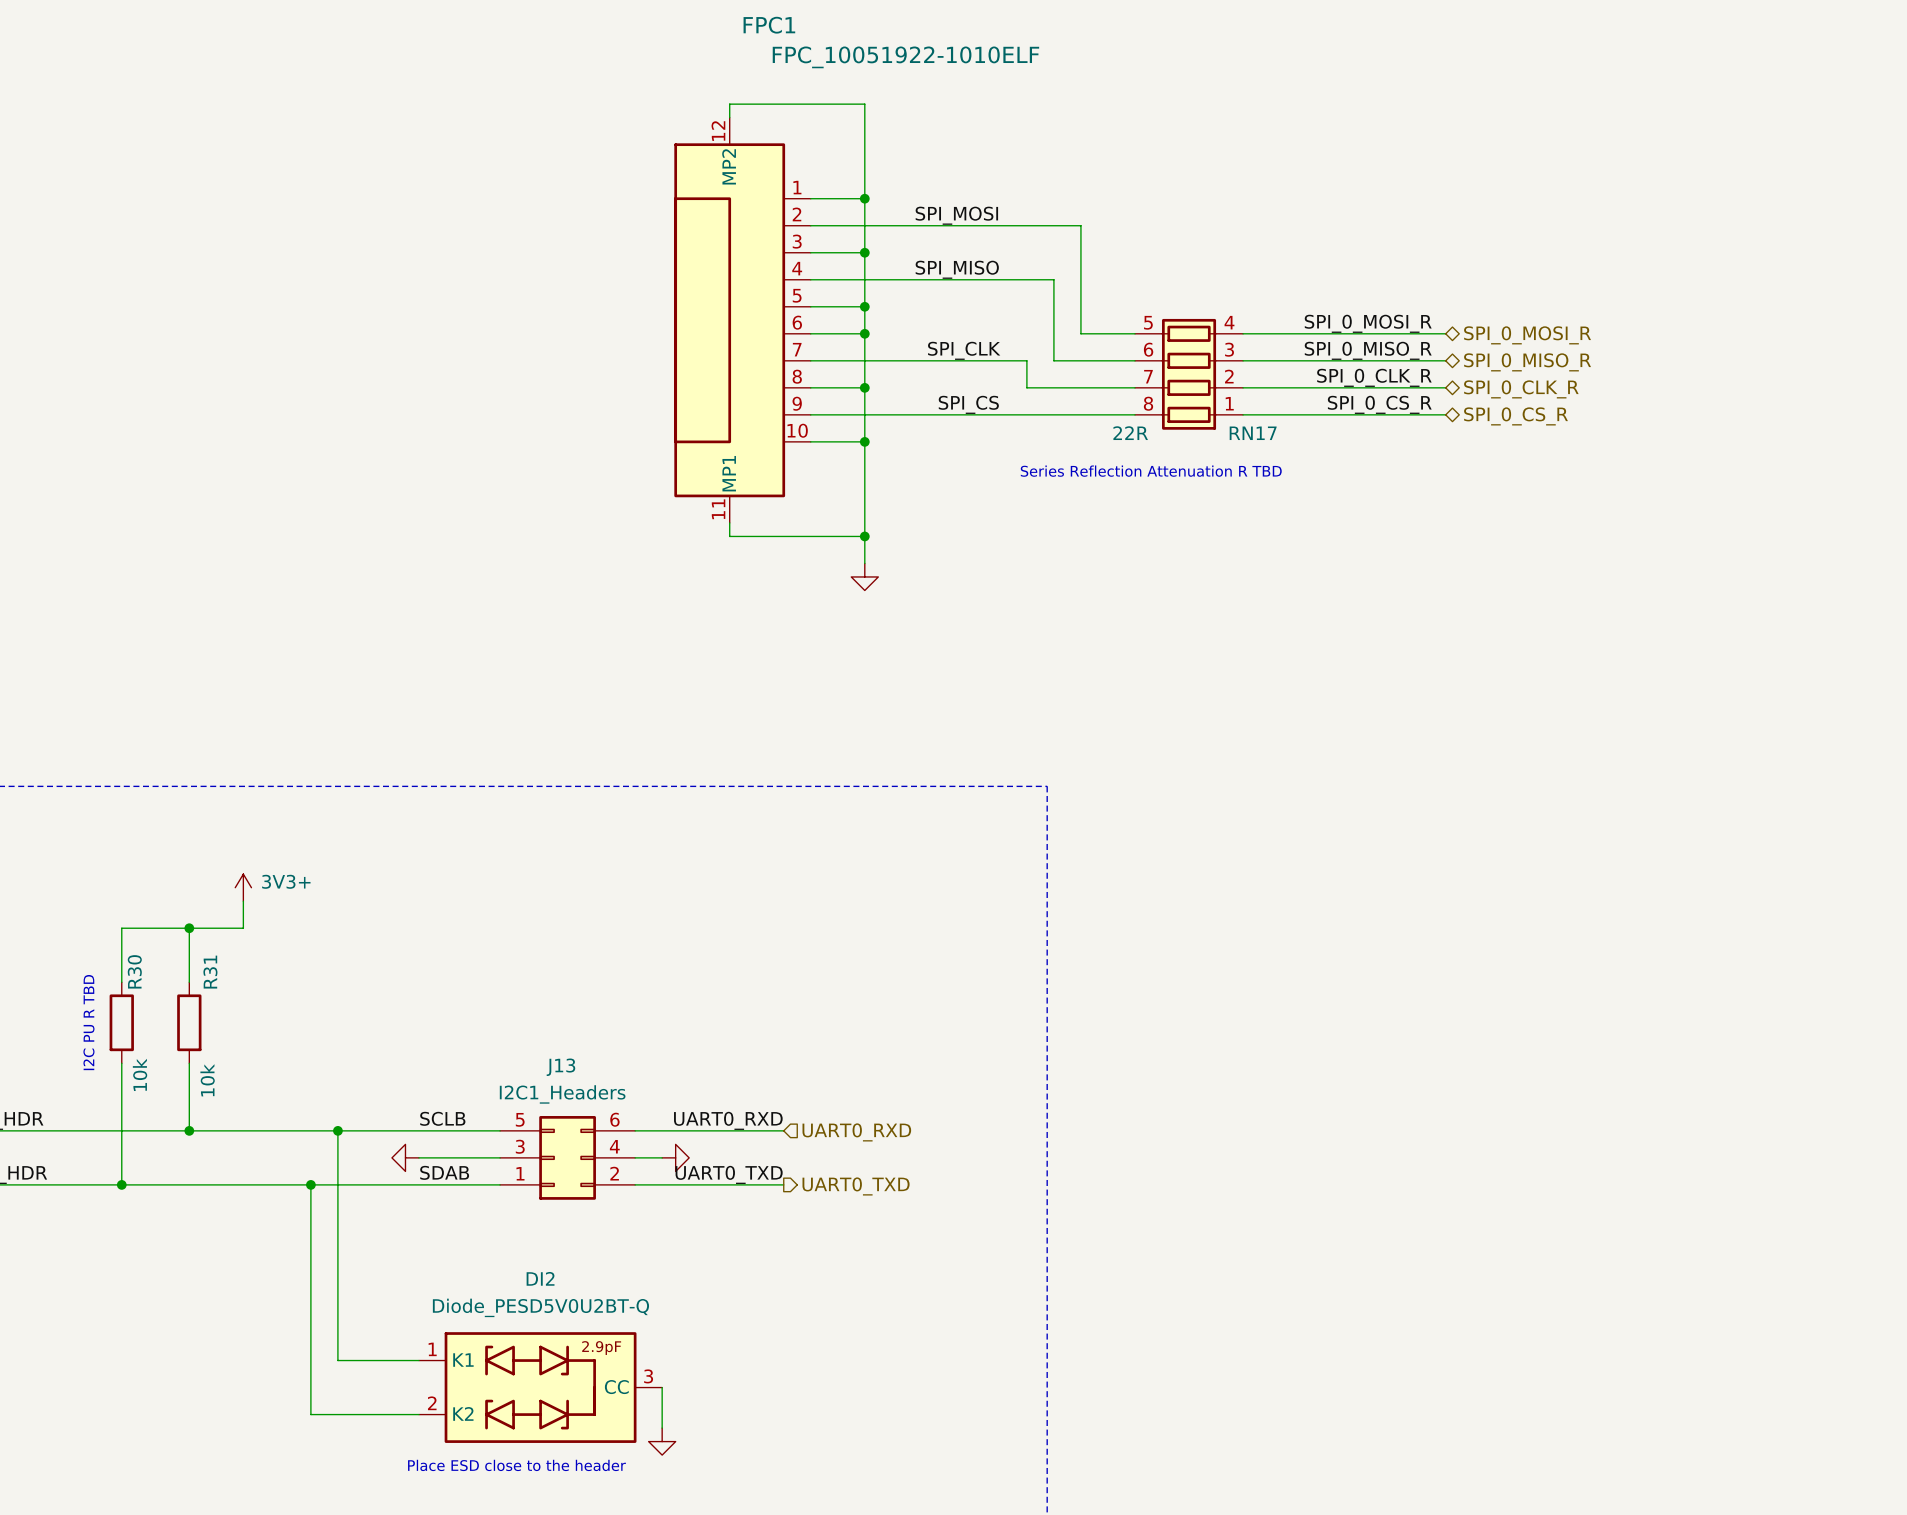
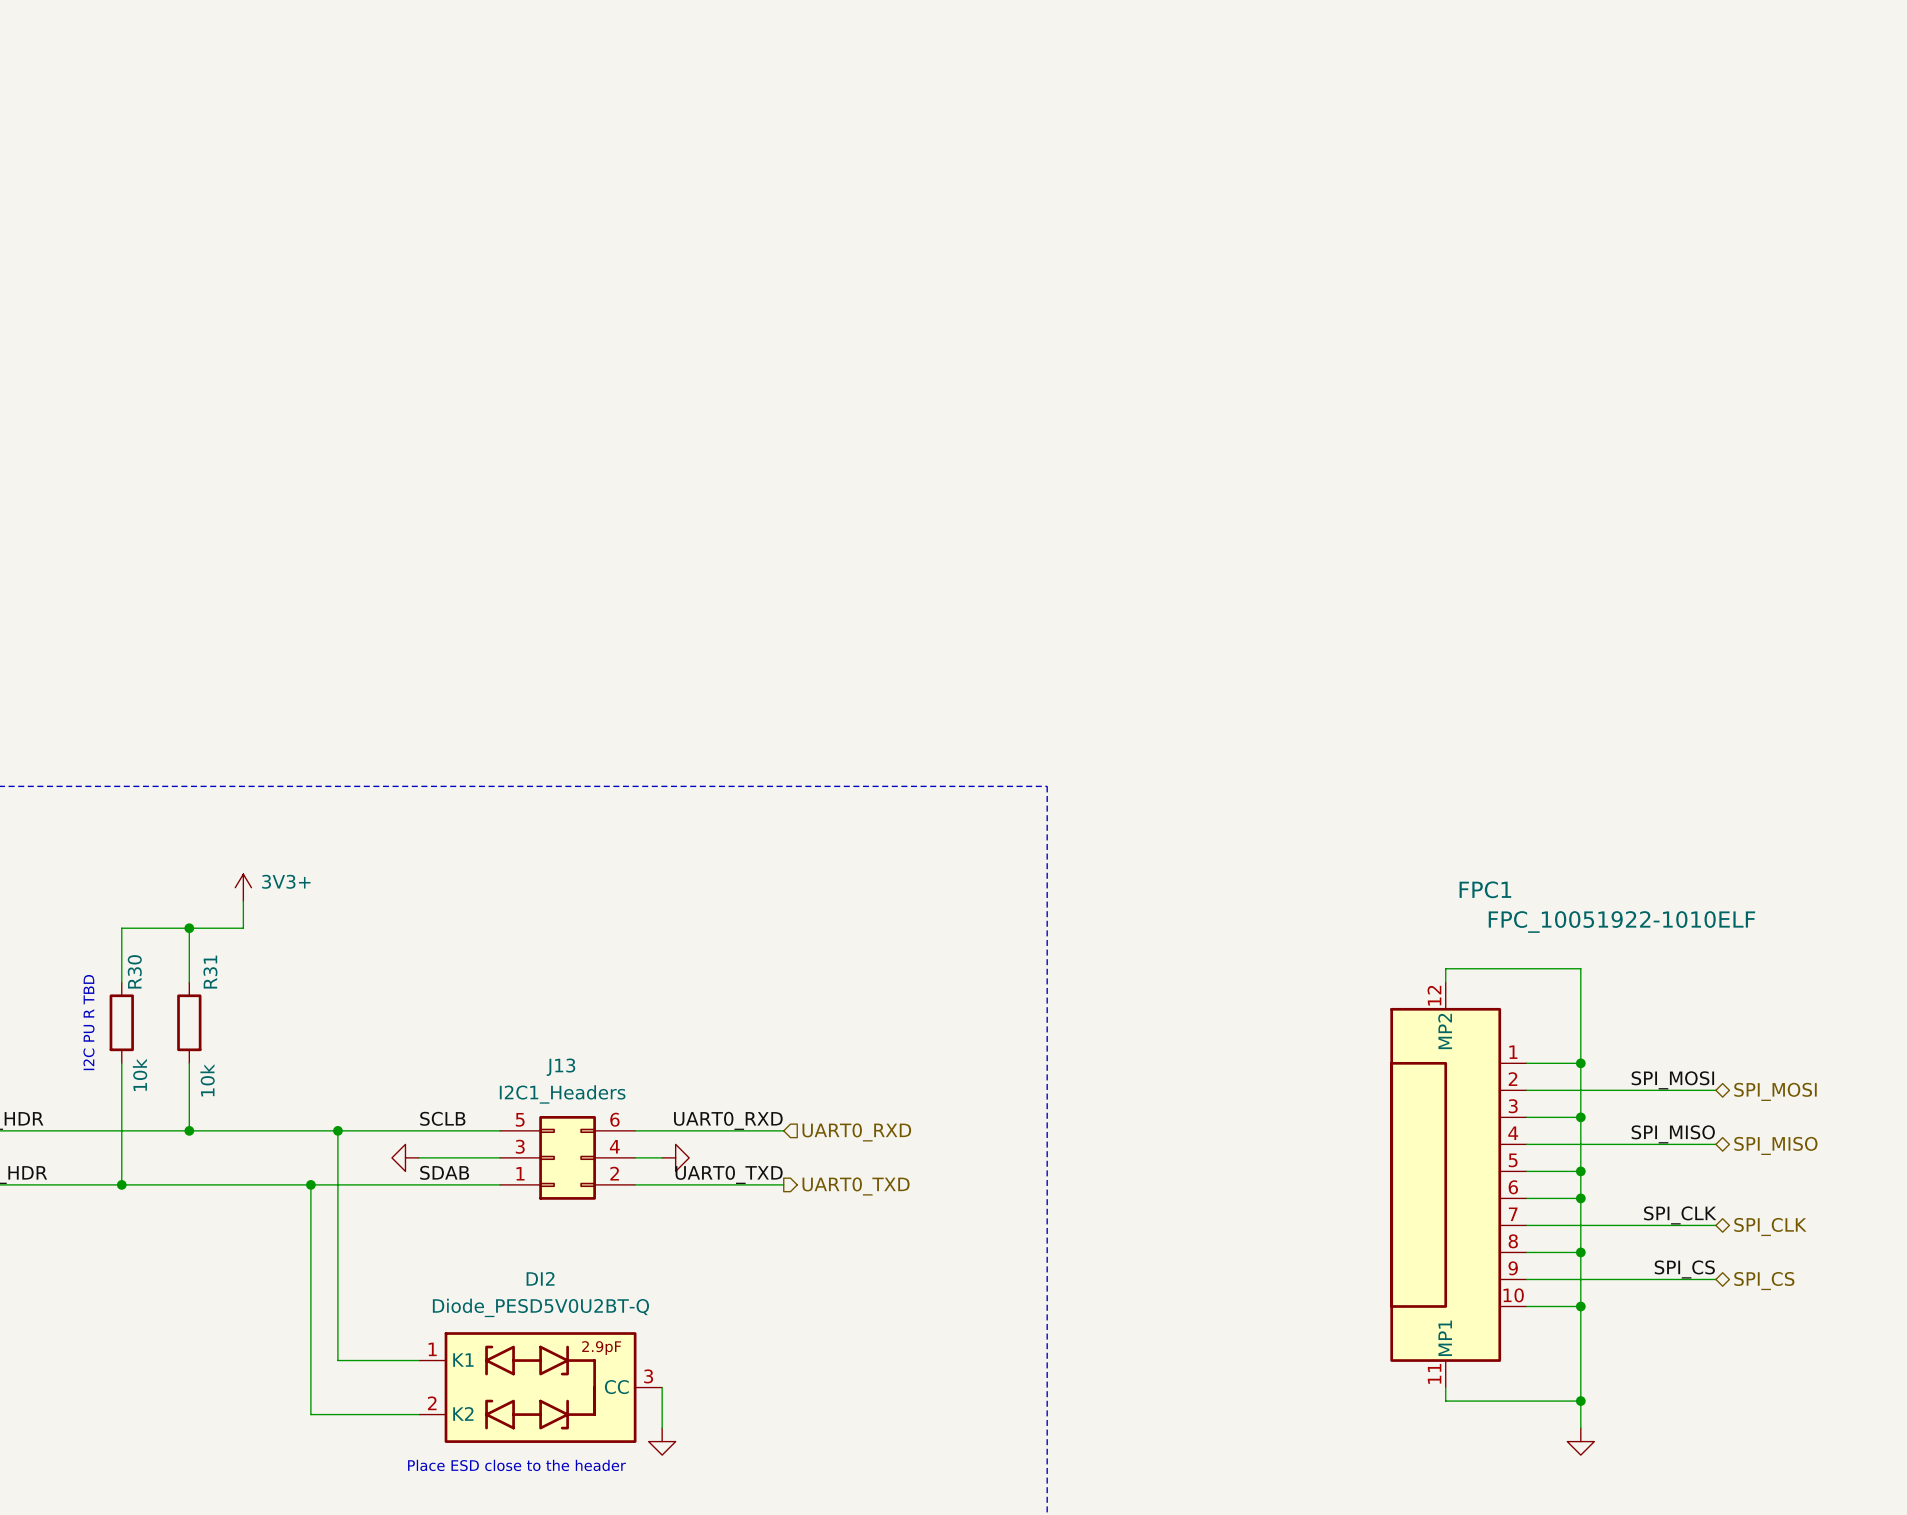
wire: (729, 117) (729, 104) (864, 104) (864, 563) -> none
wire: (810, 198) (864, 198) -> none
junction: (864, 198) -> none
label: SPI_MOSI (956, 215) -> none
wire: (810, 225) (1080, 225) (1080, 333) (1134, 333) -> none
wire: (810, 252) (864, 252) -> none
junction: (864, 252) -> none
label: SPI_MISO (957, 269) -> none
wire: (810, 279) (1053, 279) (1053, 360) (1134, 360) -> none
wire: (810, 306) (864, 306) -> none
junction: (864, 306) -> none
FPC1 position: (742, 320) -> (1458, 1184)
label: SPI_0_MOSI_R (1368, 323) -> none
wire: (810, 333) (864, 333) -> none
junction: (864, 333) -> none
wire: (1243, 333) (1445, 333) -> none
hierarchical label: SPI_0_MOSI_R (1527, 335) -> none
label: SPI_CLK (964, 350) -> none
label: SPI_0_MISO_R (1368, 350) -> none
wire: (810, 360) (1026, 360) (1026, 387) (1134, 387) -> none
wire: (1243, 360) (1445, 360) -> none
hierarchical label: SPI_0_MISO_R (1527, 362) -> none
RN17: 22R (1189, 374) -> none
label: SPI_0_CLK_R (1374, 377) -> none
wire: (810, 387) (864, 387) -> none
junction: (864, 387) -> none
wire: (1243, 387) (1445, 387) -> none
hierarchical label: SPI_0_CLK_R (1521, 389) -> none
label: SPI_CS (968, 404) -> none
label: SPI_0_CS_R (1379, 404) -> none
wire: (810, 414) (1134, 414) -> none
wire: (1243, 414) (1445, 414) -> none
hierarchical label: SPI_0_CS_R (1516, 416) -> none
wire: (810, 441) (864, 441) -> none
junction: (864, 441) -> none
text: Series Reflection Attenuation R TBD (1151, 471) -> none
wire: (729, 522) (729, 536) (864, 536) -> none
junction: (864, 536) -> none
power symbol: (864, 576) -> none
wire: none -> (1445, 982) (1445, 968) (1580, 968) (1580, 1428)
wire: none -> (1526, 1063) (1580, 1063)
junction: none -> (1580, 1063)
label: none -> SPI_MOSI (1672, 1080)
wire: none -> (1526, 1090) (1715, 1090)
hierarchical label: none -> SPI_MOSI (1775, 1091)
wire: none -> (1526, 1117) (1580, 1117)
junction: none -> (1580, 1117)
label: none -> SPI_MISO (1673, 1134)
wire: none -> (1526, 1144) (1715, 1144)
hierarchical label: none -> SPI_MISO (1775, 1145)
wire: none -> (1526, 1171) (1580, 1171)
junction: none -> (1580, 1171)
wire: none -> (1526, 1198) (1580, 1198)
junction: none -> (1580, 1198)
label: none -> SPI_CLK (1680, 1215)
wire: none -> (1526, 1225) (1715, 1225)
hierarchical label: none -> SPI_CLK (1770, 1226)
wire: none -> (1526, 1252) (1580, 1252)
junction: none -> (1580, 1252)
label: none -> SPI_CS (1684, 1269)
wire: none -> (1526, 1279) (1715, 1279)
hierarchical label: none -> SPI_CS (1764, 1281)
wire: none -> (1526, 1306) (1580, 1306)
junction: none -> (1580, 1306)
wire: none -> (1445, 1387) (1445, 1401) (1580, 1401)
junction: none -> (1580, 1401)
power symbol: none -> (1580, 1441)

